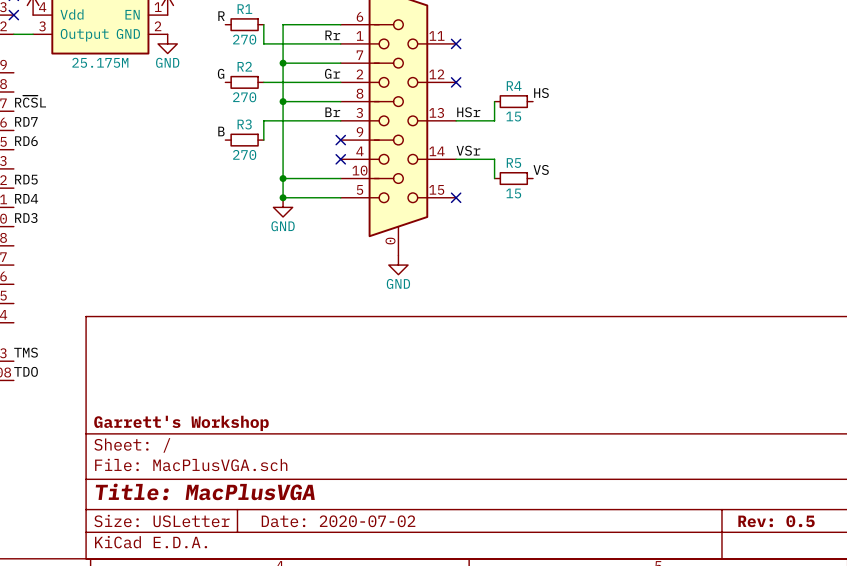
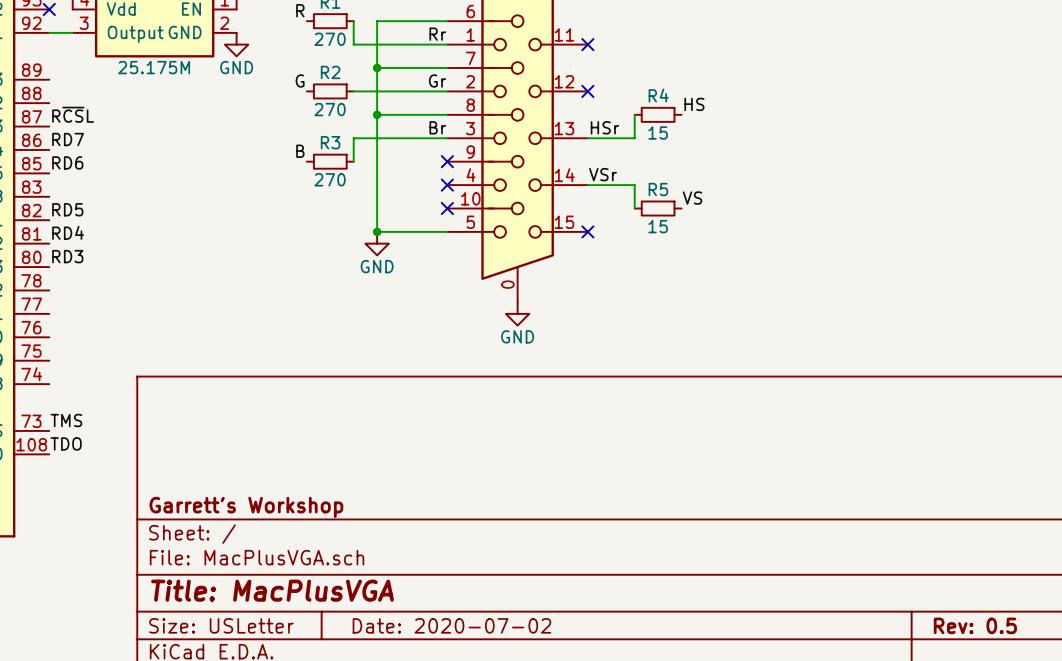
wire: (283, 178) (340, 178) -> none
junction: (283, 178) -> none
no-connect mark: none -> (447, 208)

